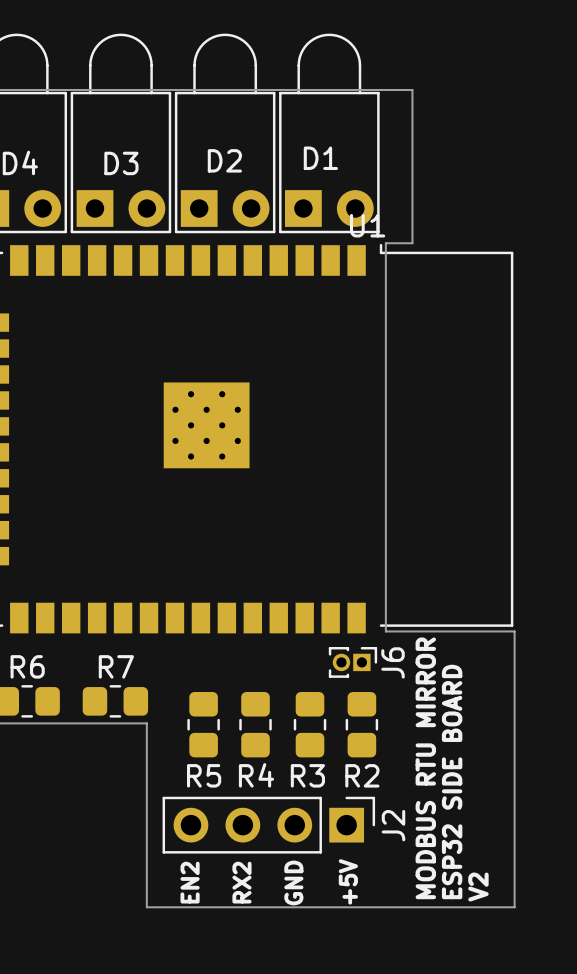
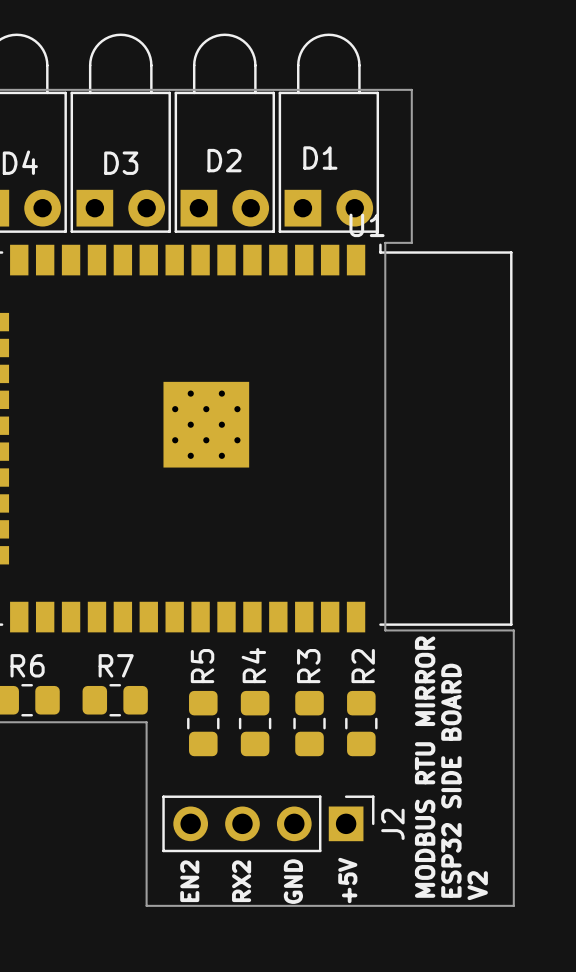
J6: (352, 662) -> none
R5 name rotation: 0° (204, 775) -> 90° counterclockwise (202, 666)
R5 name position: R5 (204, 775) -> R5 (202, 666)
R4 name rotation: 0° (256, 775) -> 90° counterclockwise (253, 665)
R4 name position: R4 (256, 775) -> R4 (253, 665)
R3 name rotation: 0° (307, 775) -> 90° counterclockwise (308, 666)
R3 name position: R3 (307, 775) -> R3 (308, 666)
R2 name rotation: 0° (362, 775) -> 90° counterclockwise (363, 666)
R2 name position: R2 (362, 775) -> R2 (363, 666)

